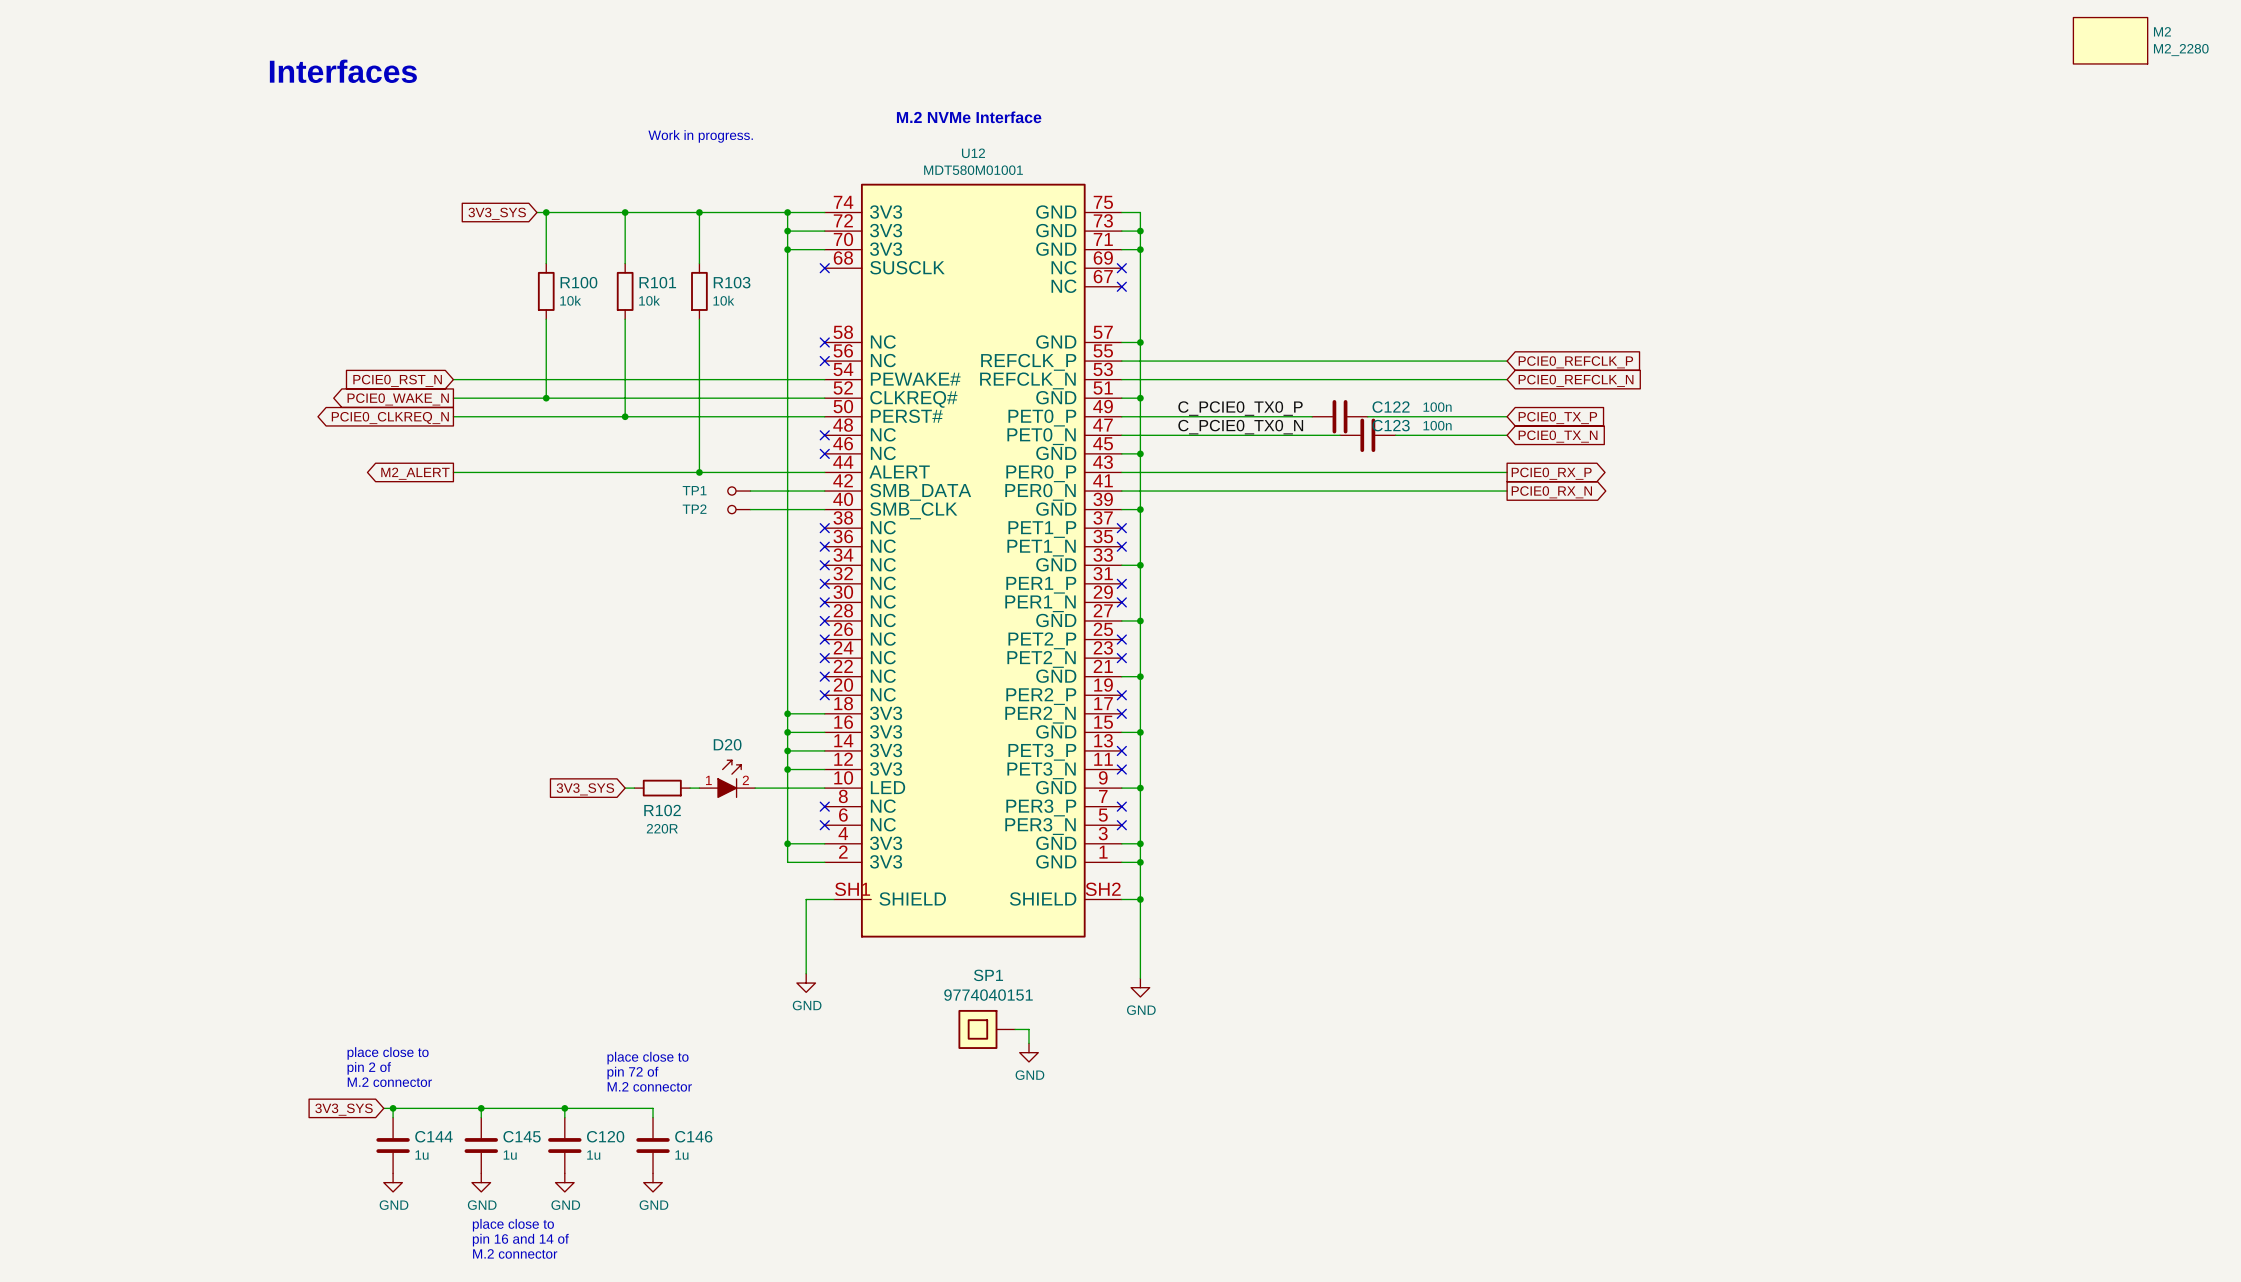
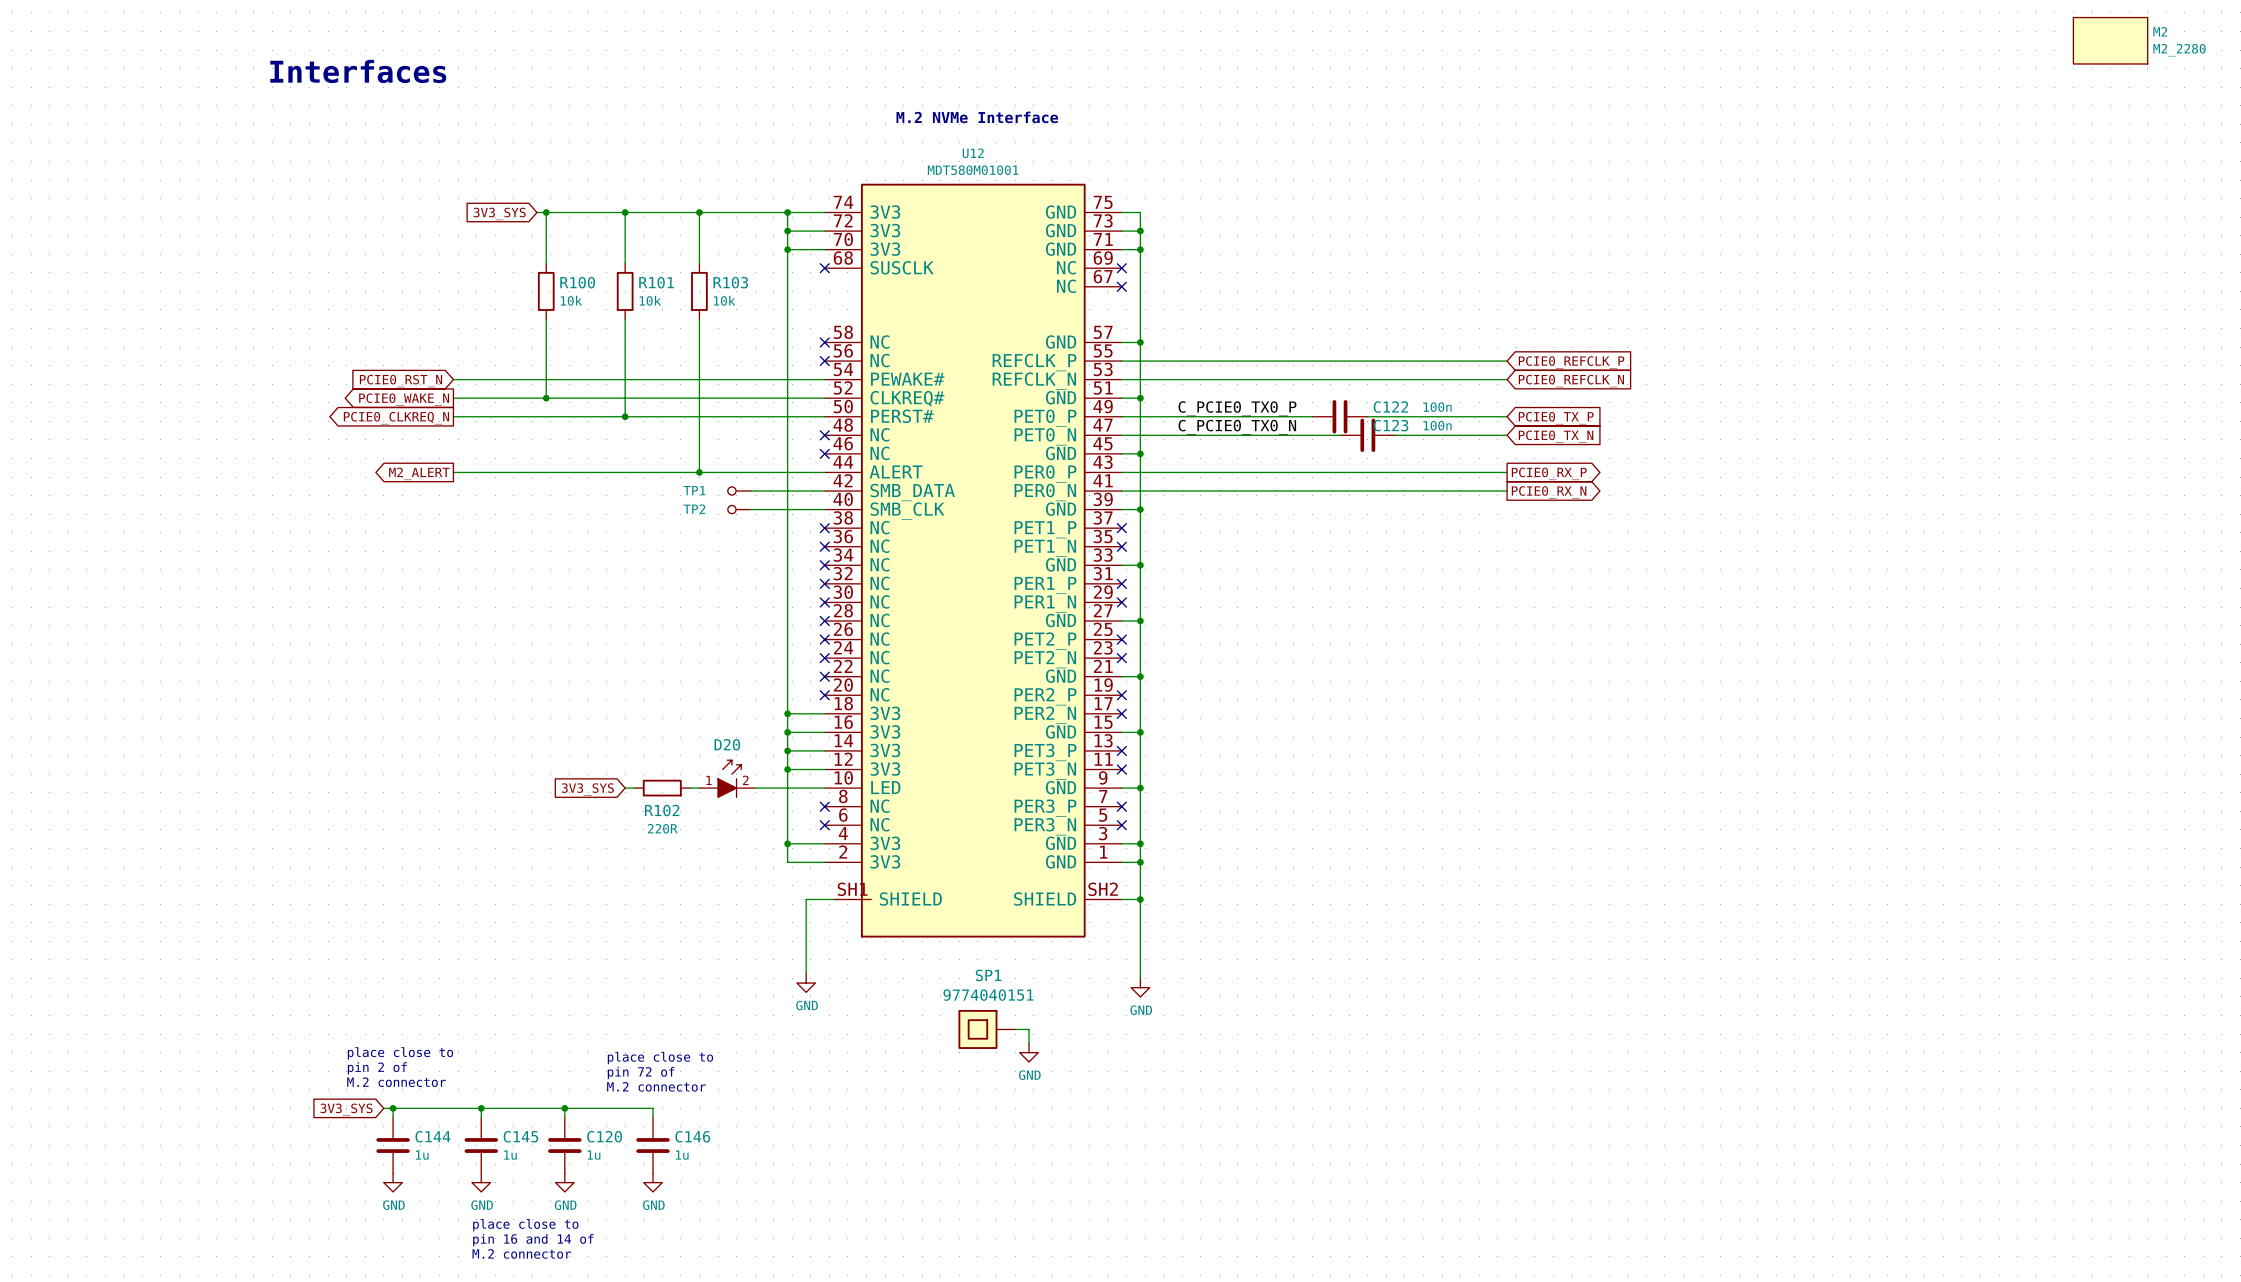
text: Work in progress. (700, 136) -> none

